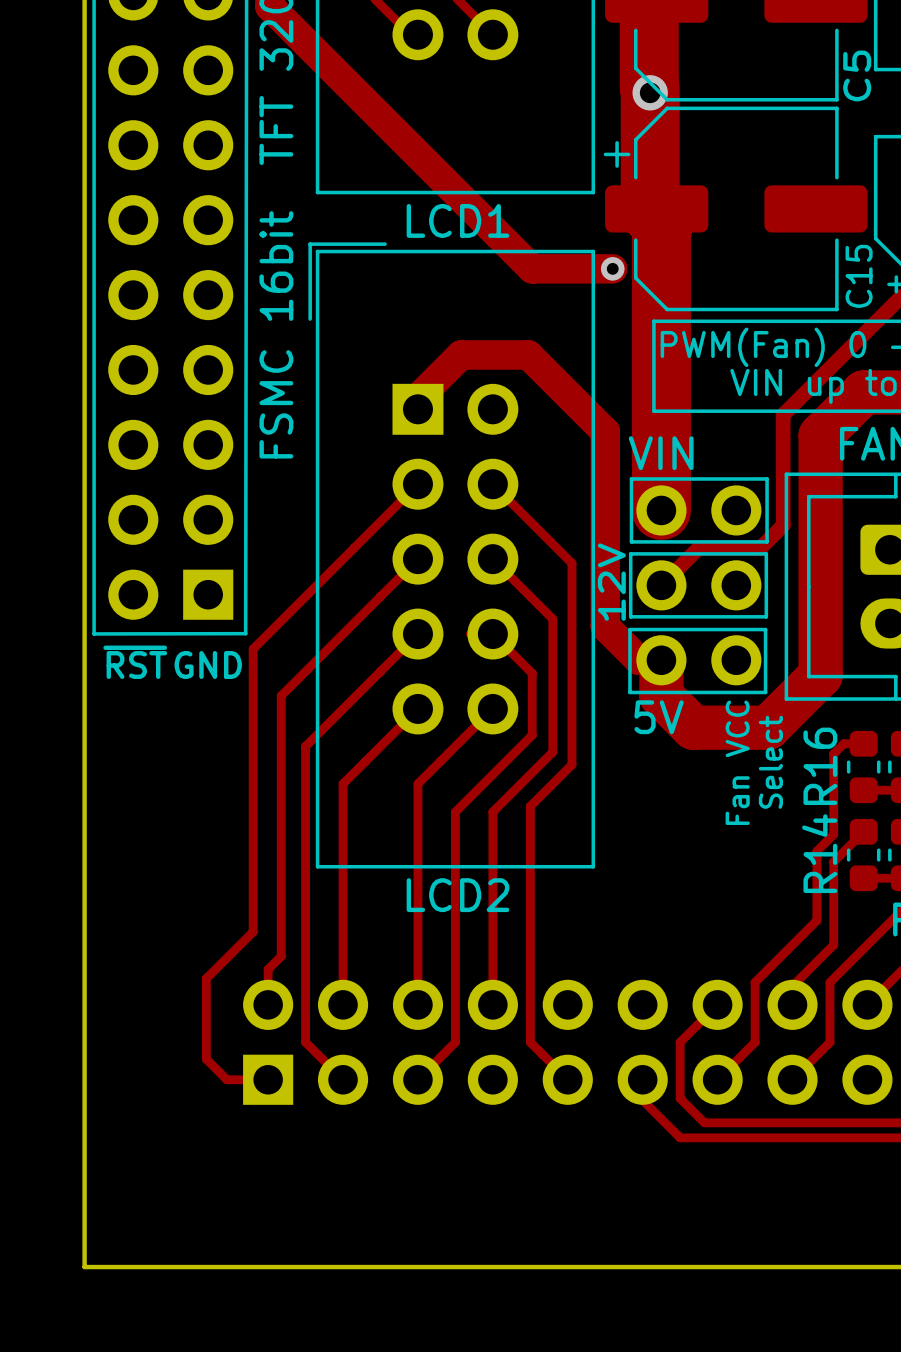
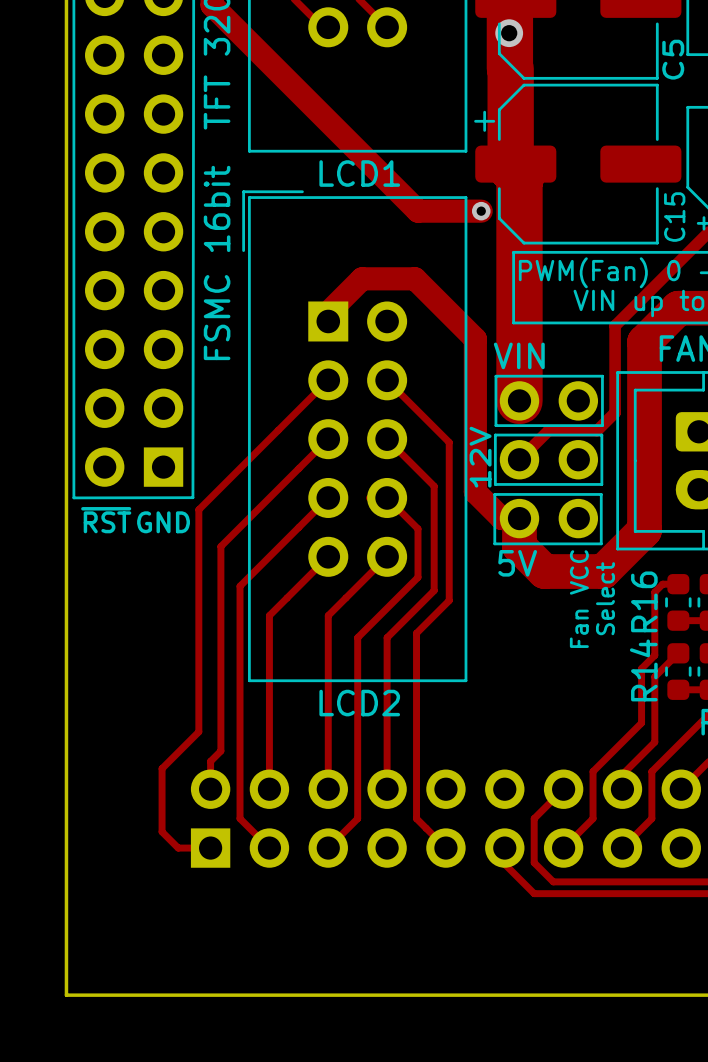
via position: (650, 92) -> (509, 33)

